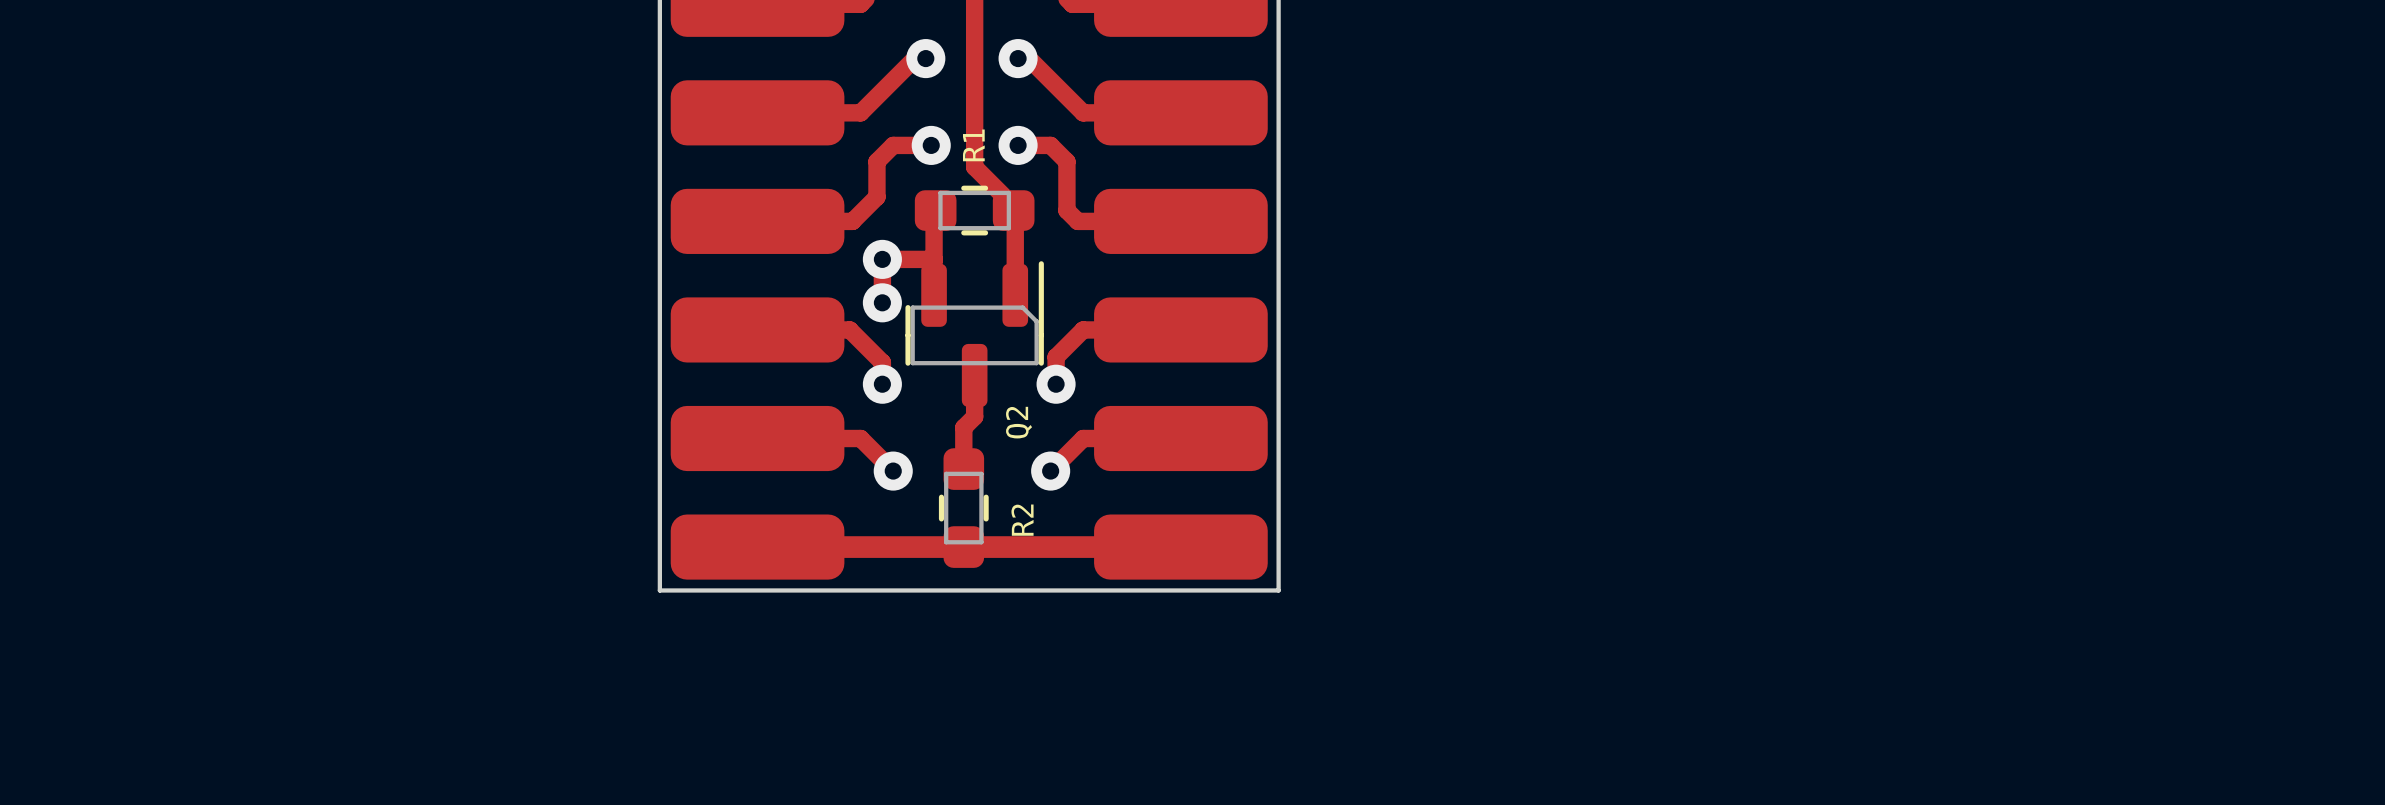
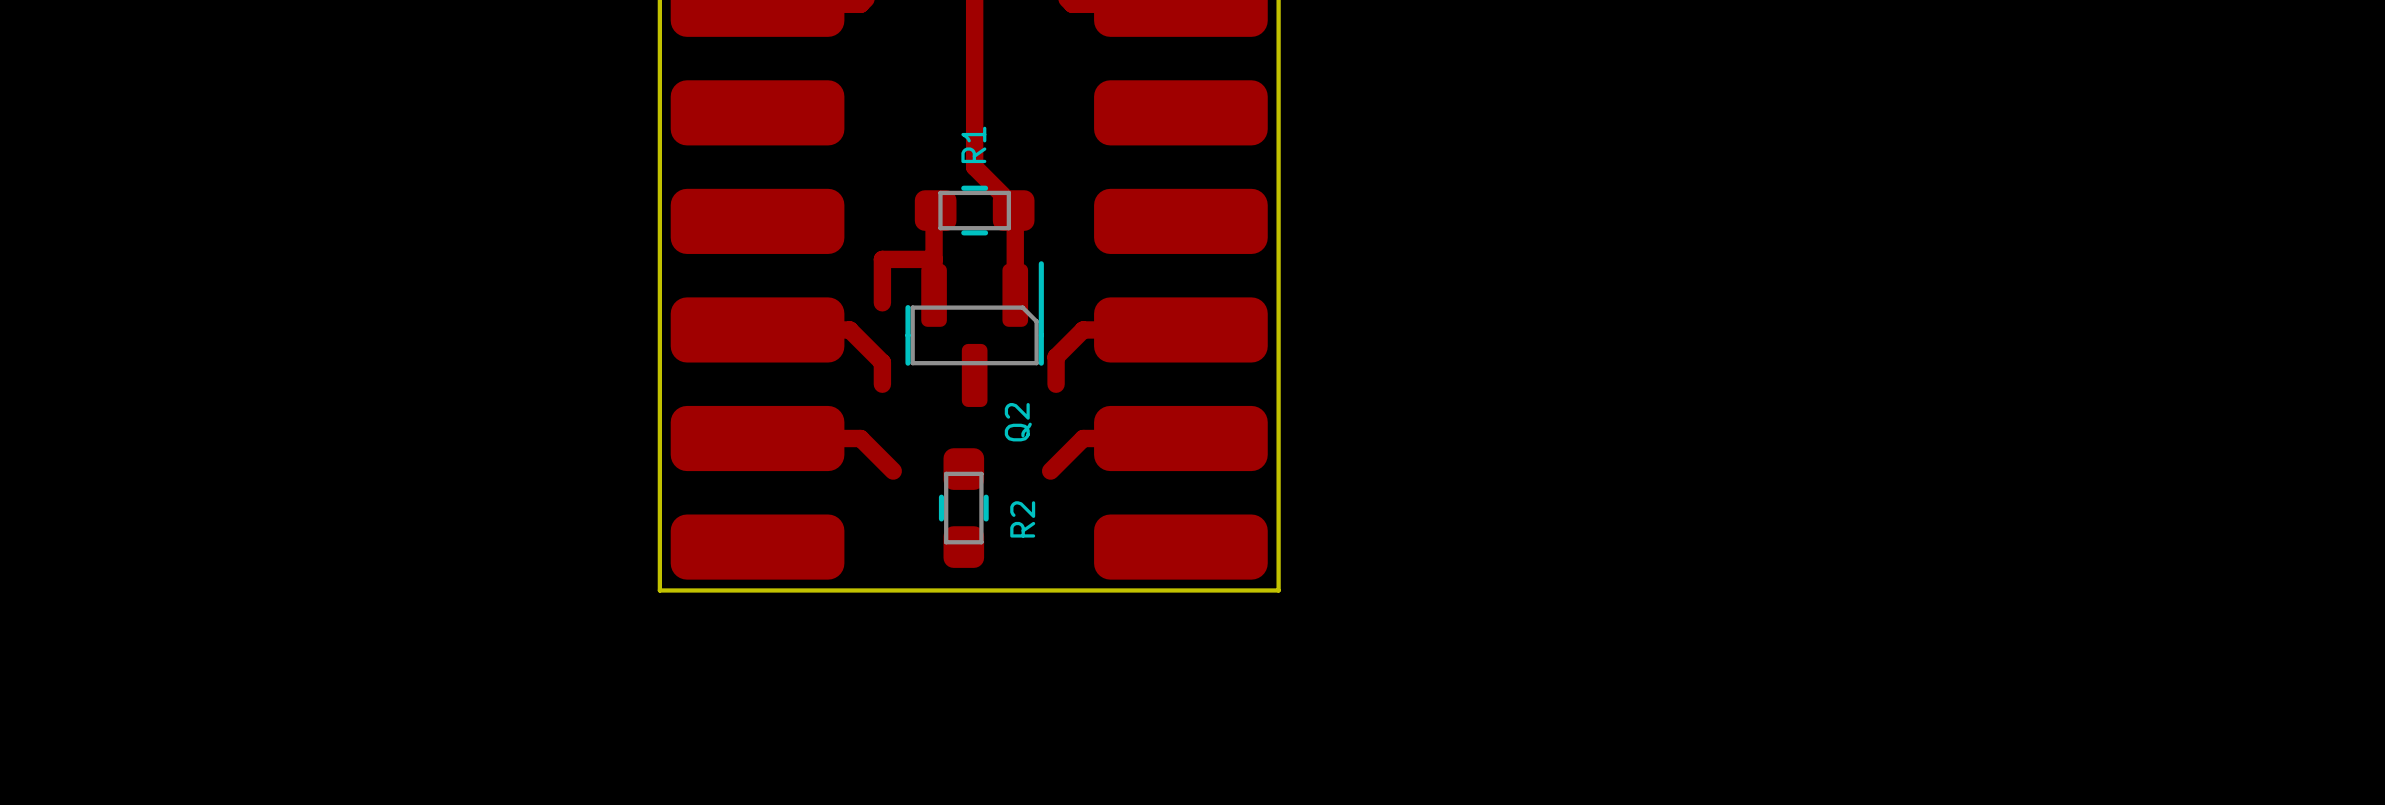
track: (925, 58) (914, 58) (860, 112) (757, 112) -> none
via: (925, 58) -> none
track: (1018, 58) (1028, 58) (1083, 112) (1170, 112) -> none
via: (1018, 58) -> none
track: (931, 145) (893, 145) (876, 161) (876, 196) (852, 221) (757, 221) -> none
via: (931, 145) -> none
track: (1018, 145) (1050, 145) (1066, 161) (1066, 210) (1077, 221) (1180, 221) -> none
via: (1018, 145) -> none
via: (882, 259) -> none
via: (882, 302) -> none
track: (974, 375) (974, 416) (963, 427) (963, 469) -> none
via: (882, 384) -> none
via: (1056, 384) -> none
via: (893, 471) -> none
via: (1050, 471) -> none
track: (757, 547) (1153, 547) -> none

